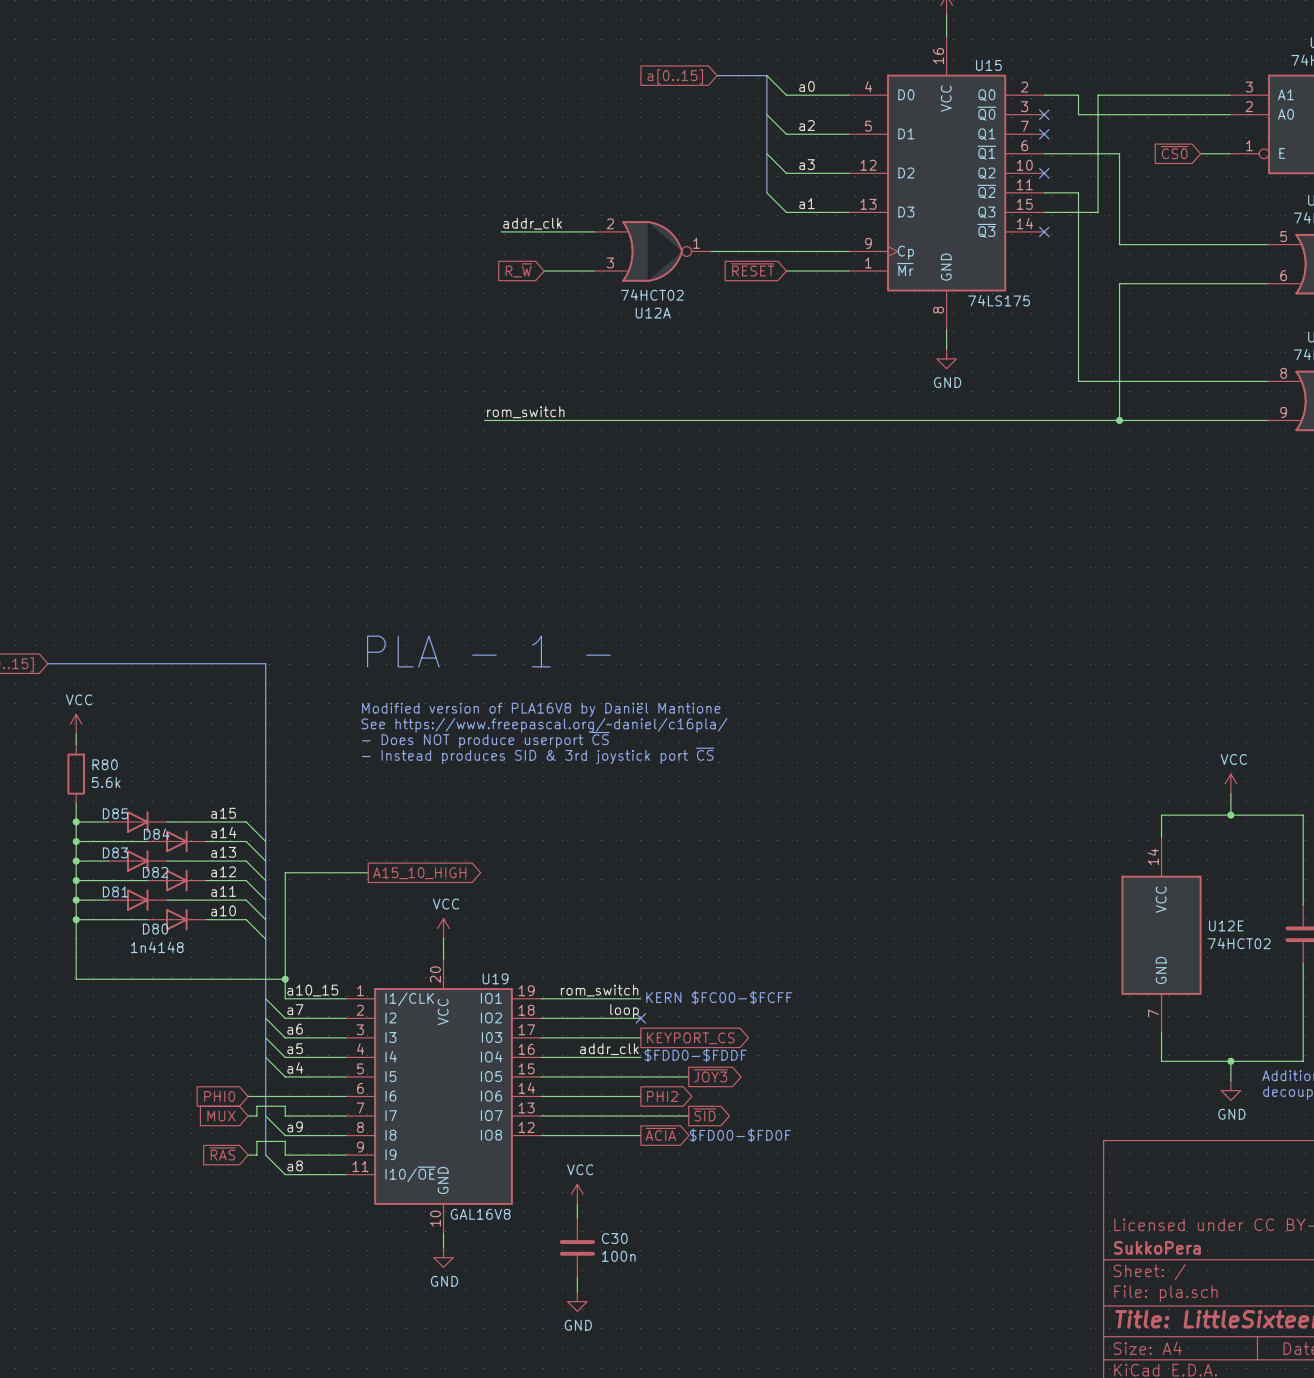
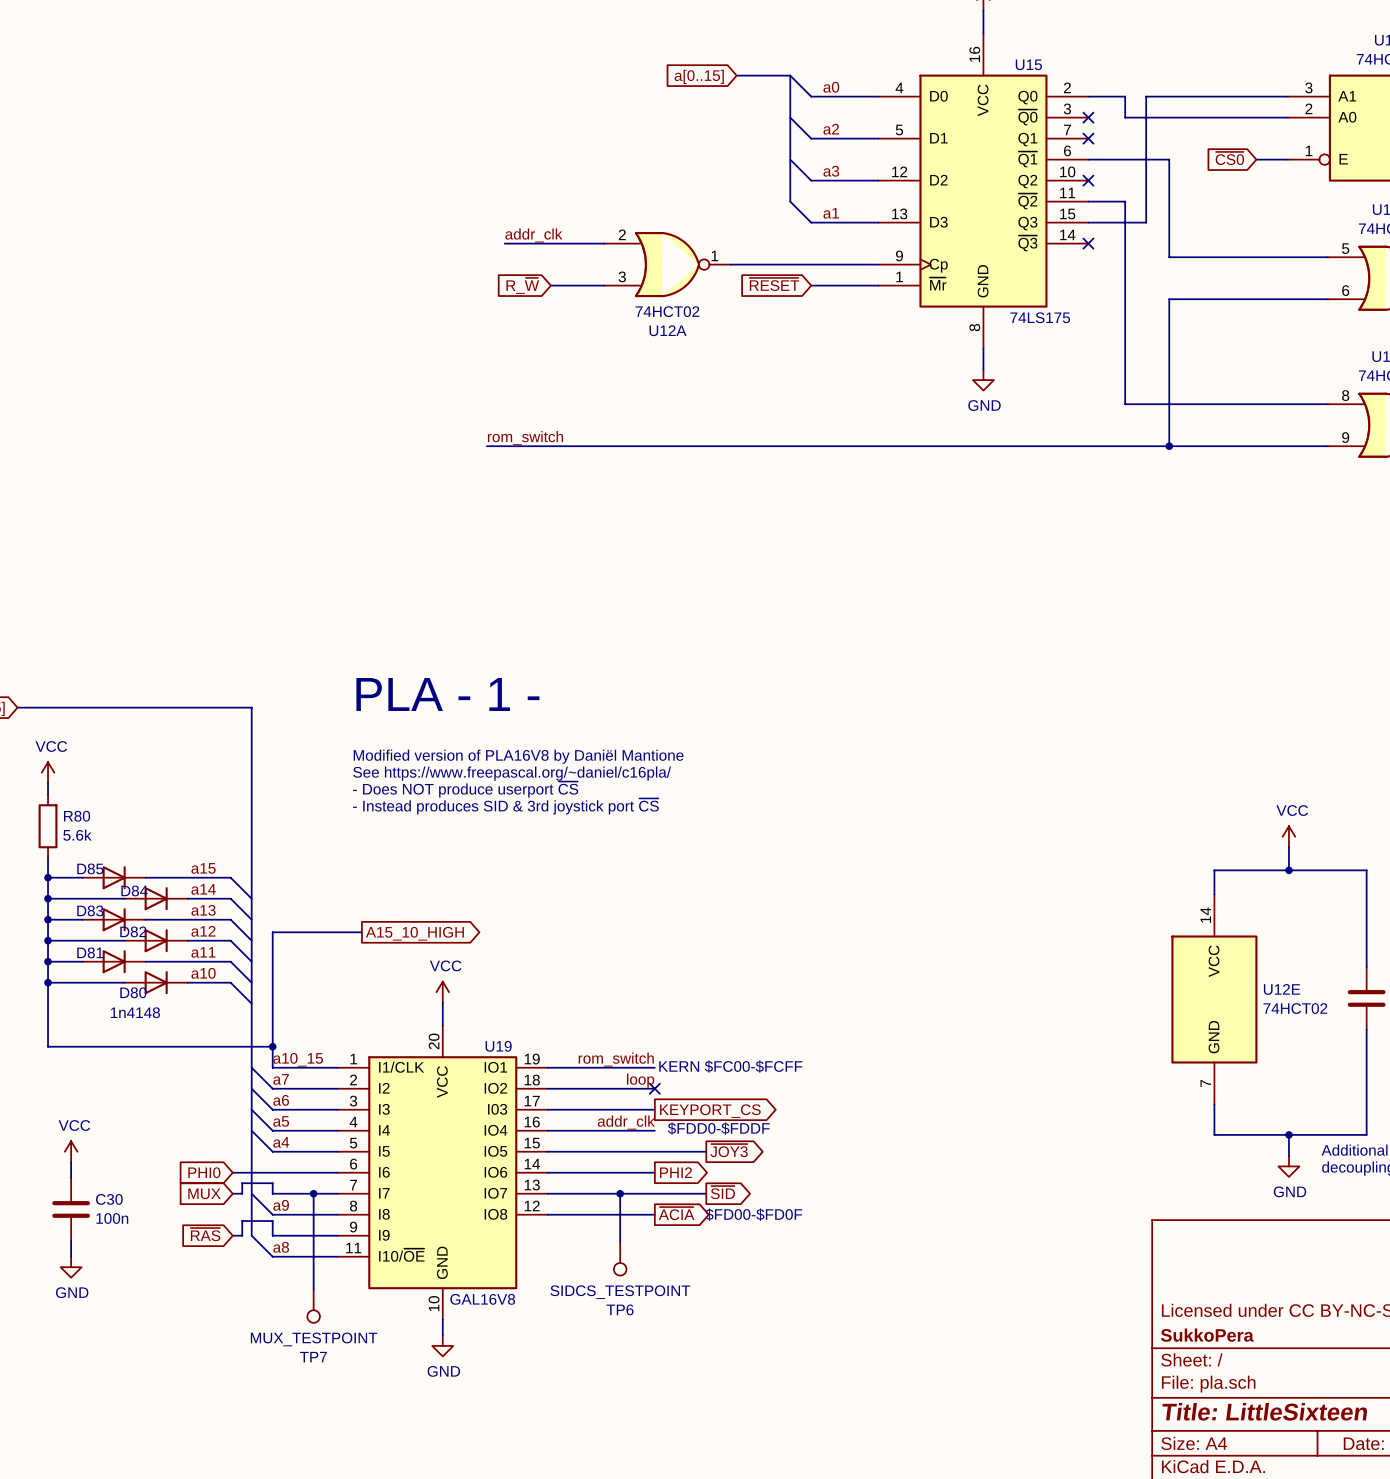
power symbol: none -> VCC (71, 1151)
wire: none -> (71, 1162) (71, 1177)
wire: none -> (313, 1193) (313, 1289)
junction: none -> (313, 1193)
wire: none -> (620, 1193) (620, 1242)
junction: none -> (620, 1193)
wire: none -> (71, 1240) (71, 1256)
TP6: none -> SIDCS_TESTPOINT (620, 1258)
power symbol: none -> GND (71, 1267)
power symbol: VCC (577, 1194) -> none
wire: (577, 1203) (577, 1218) -> none
TP7: none -> MUX_TESTPOINT (313, 1306)
C30 position: (577, 1247) -> (71, 1209)
wire: (577, 1277) (577, 1291) -> none
power symbol: GND (577, 1301) -> none

